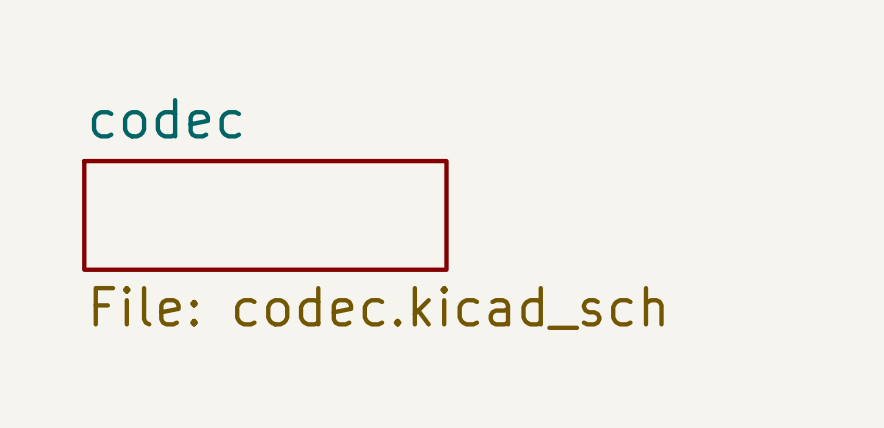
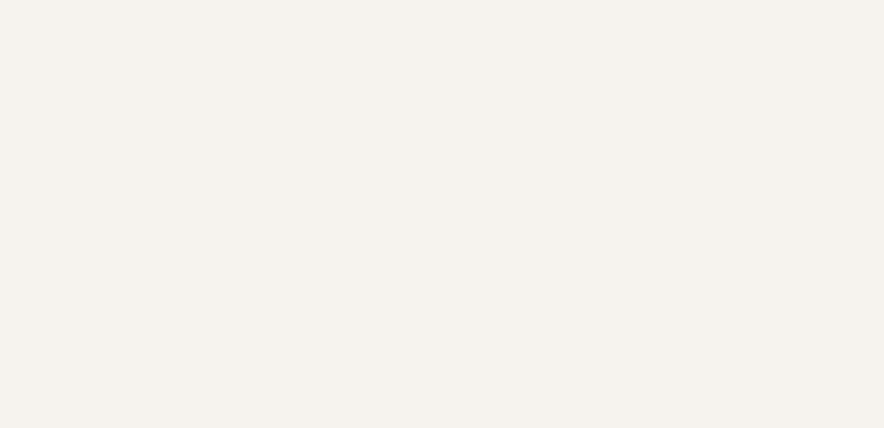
sheet codec: File: codec.kicad_sch (265, 215) -> none

